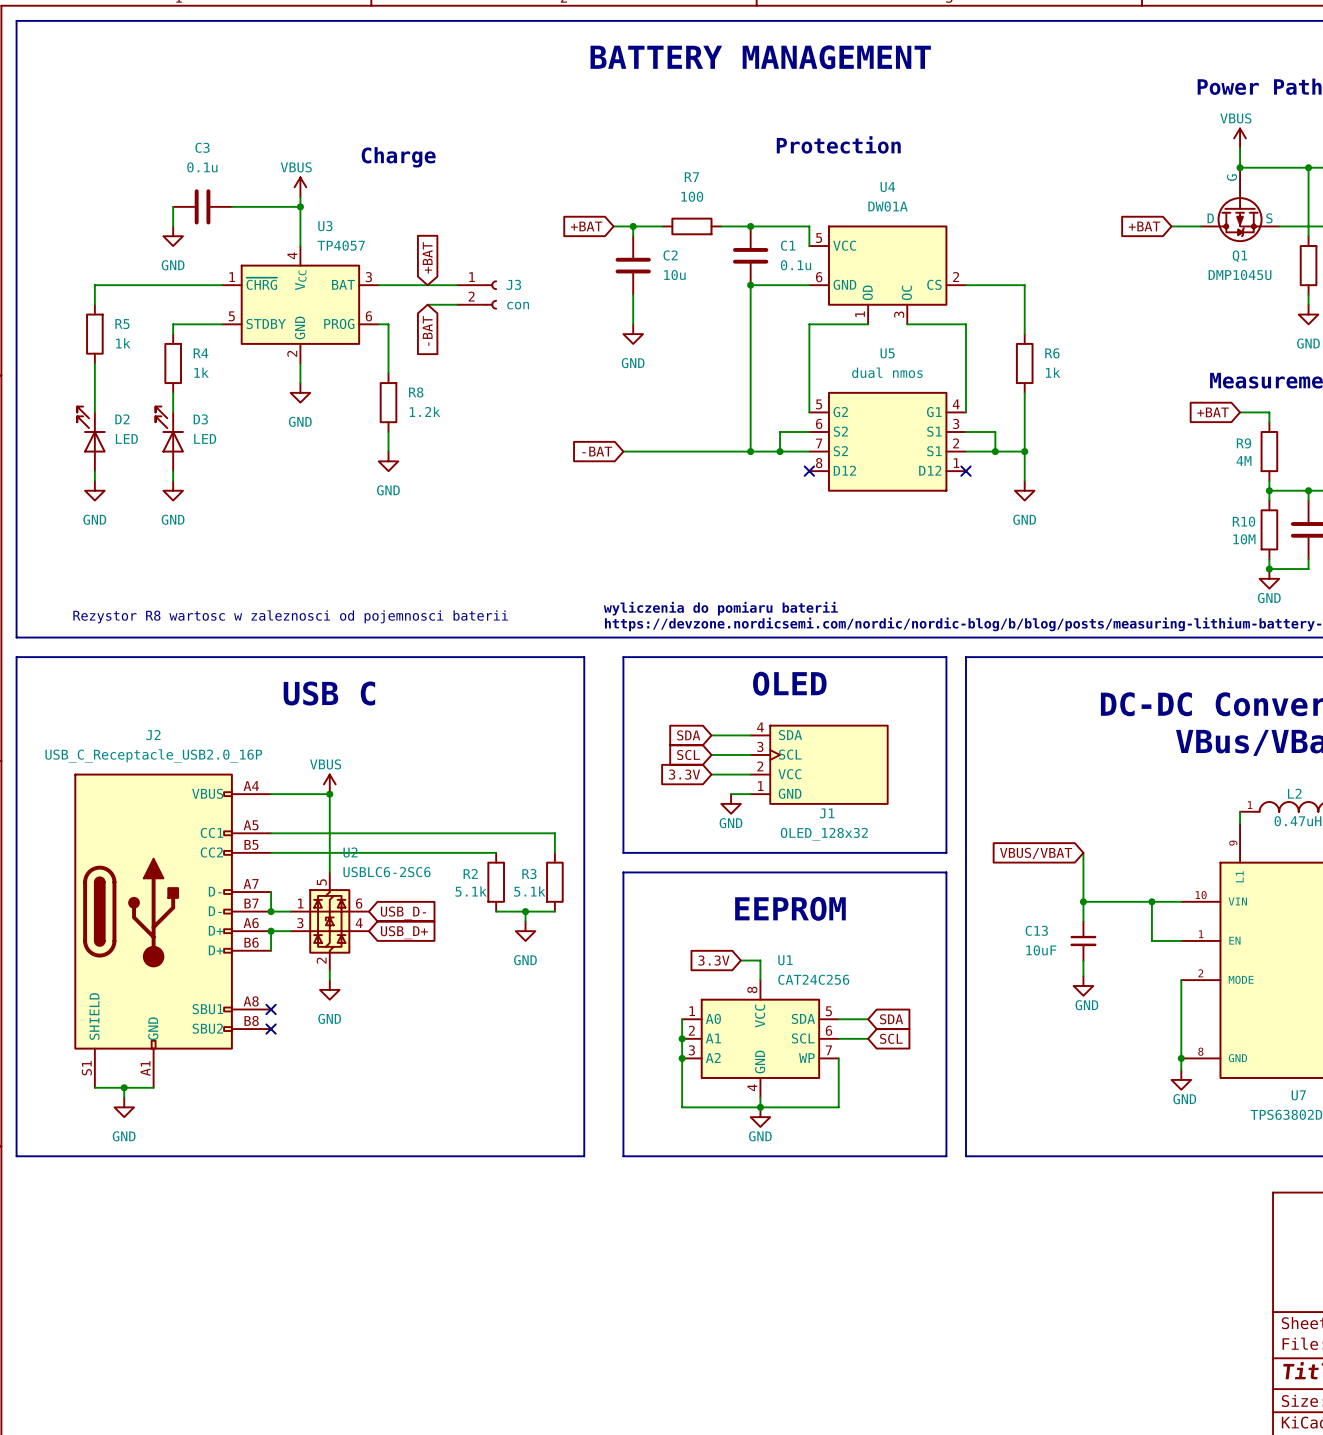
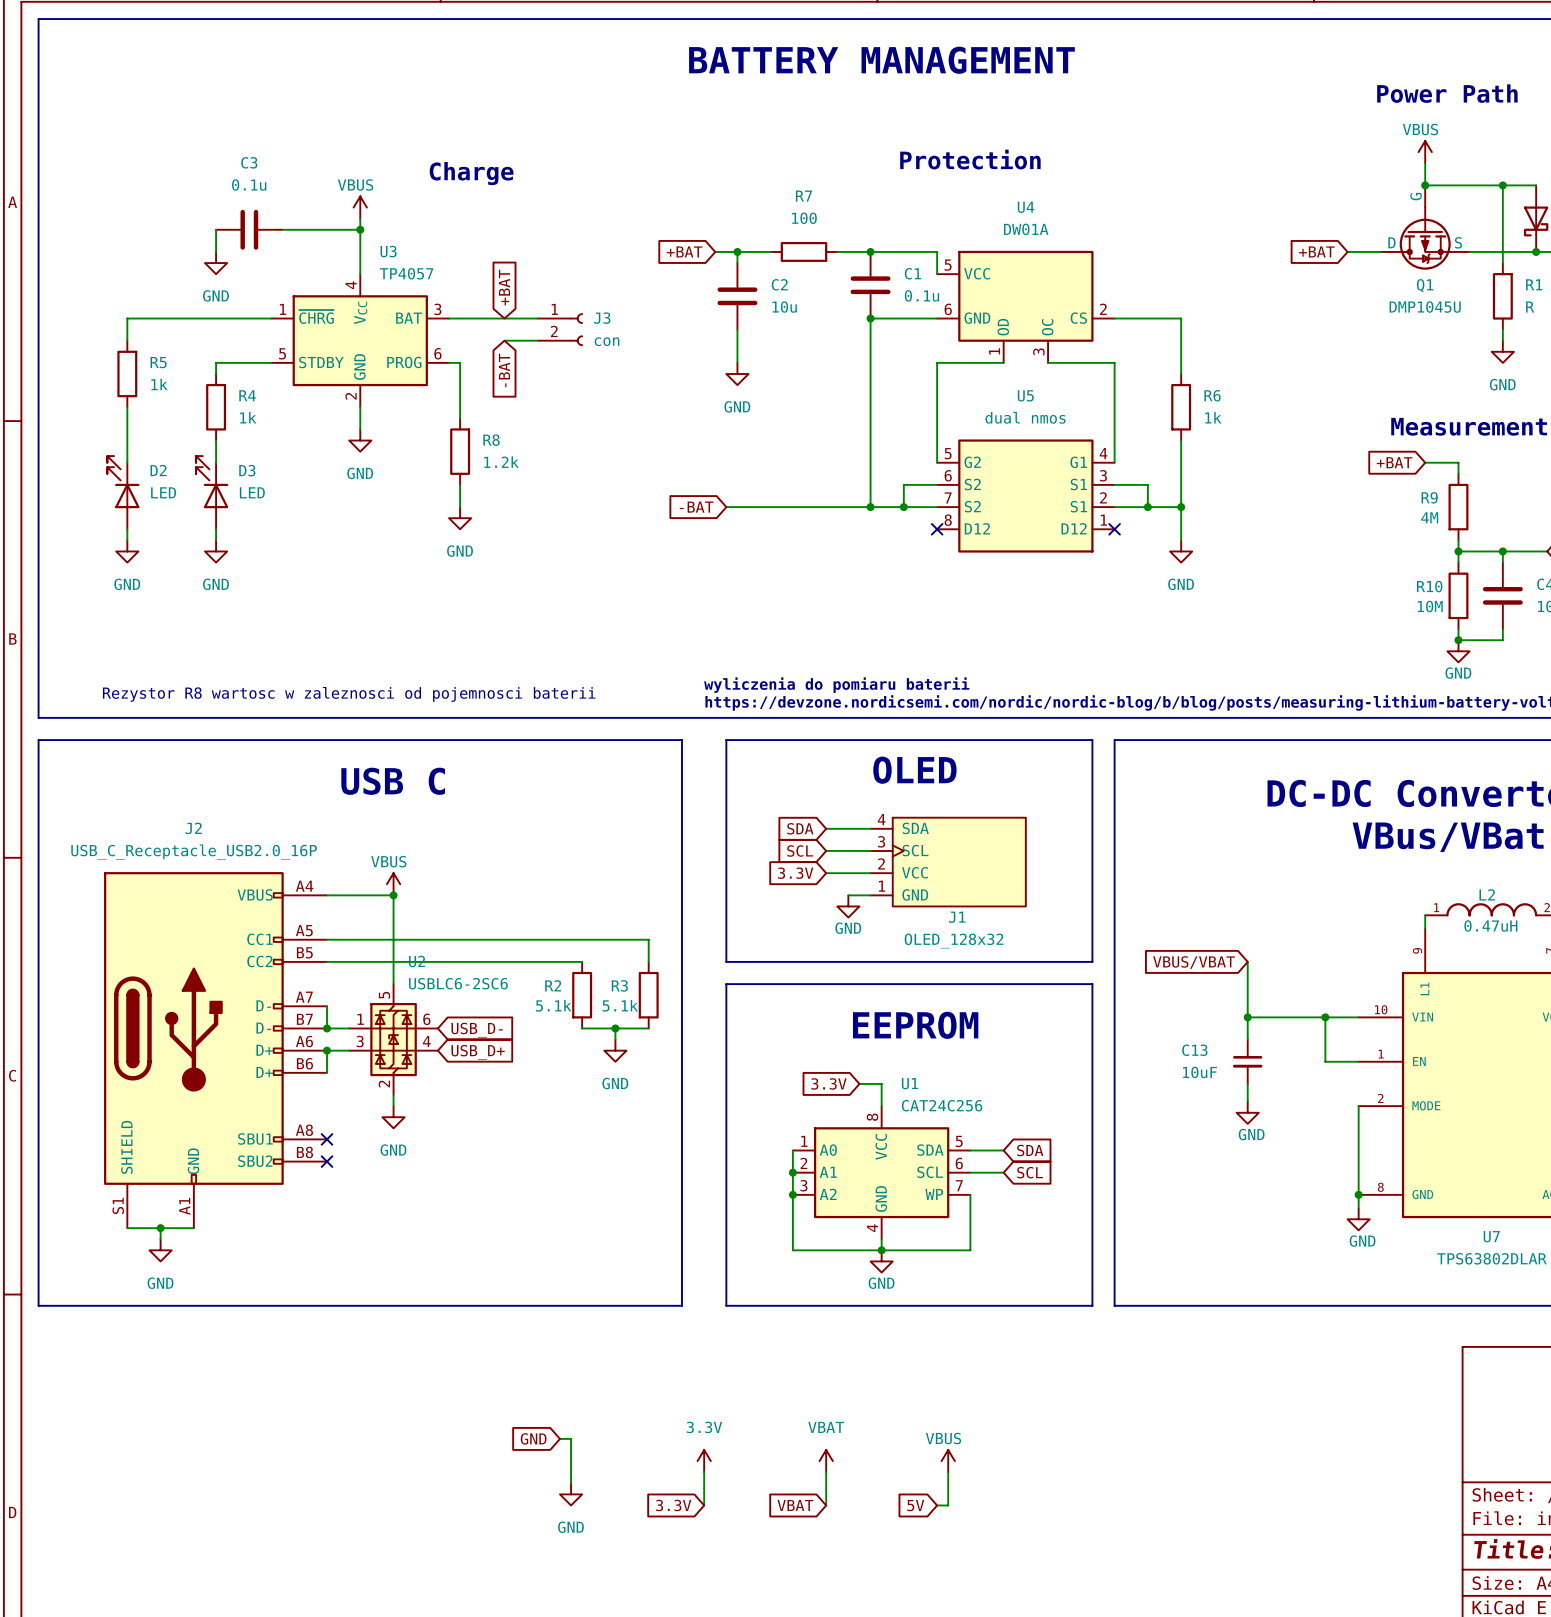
global label: none -> GND (533, 1438)
wire: none -> (559, 1438) (571, 1438) (571, 1483)
power symbol: none -> 3.3V (704, 1461)
power symbol: none -> VBAT (826, 1461)
power symbol: none -> VBUS (948, 1461)
wire: none -> (704, 1472) (704, 1505)
wire: none -> (826, 1472) (826, 1505)
wire: none -> (948, 1472) (948, 1505) (937, 1505)
power symbol: none -> GND (571, 1494)
global label: none -> 3.3V (673, 1505)
global label: none -> VBAT (795, 1505)
global label: none -> 5V (915, 1505)

